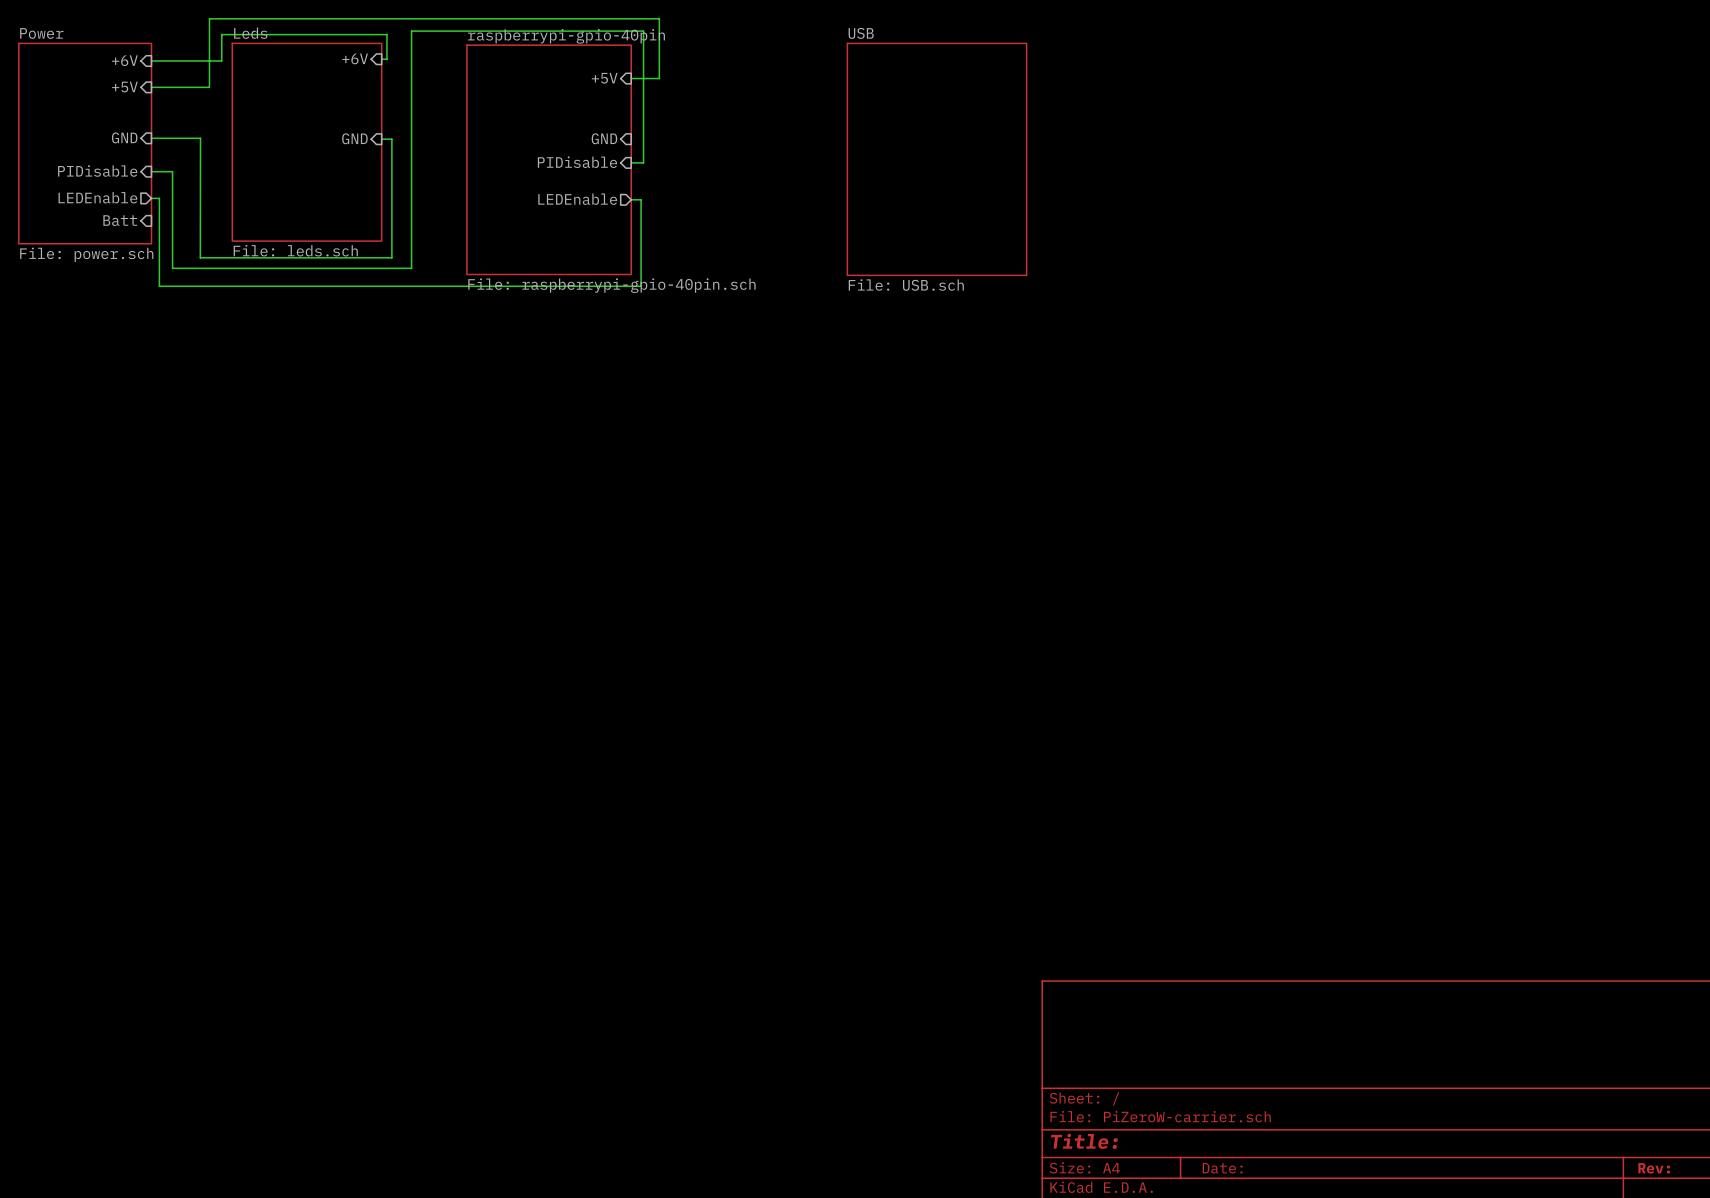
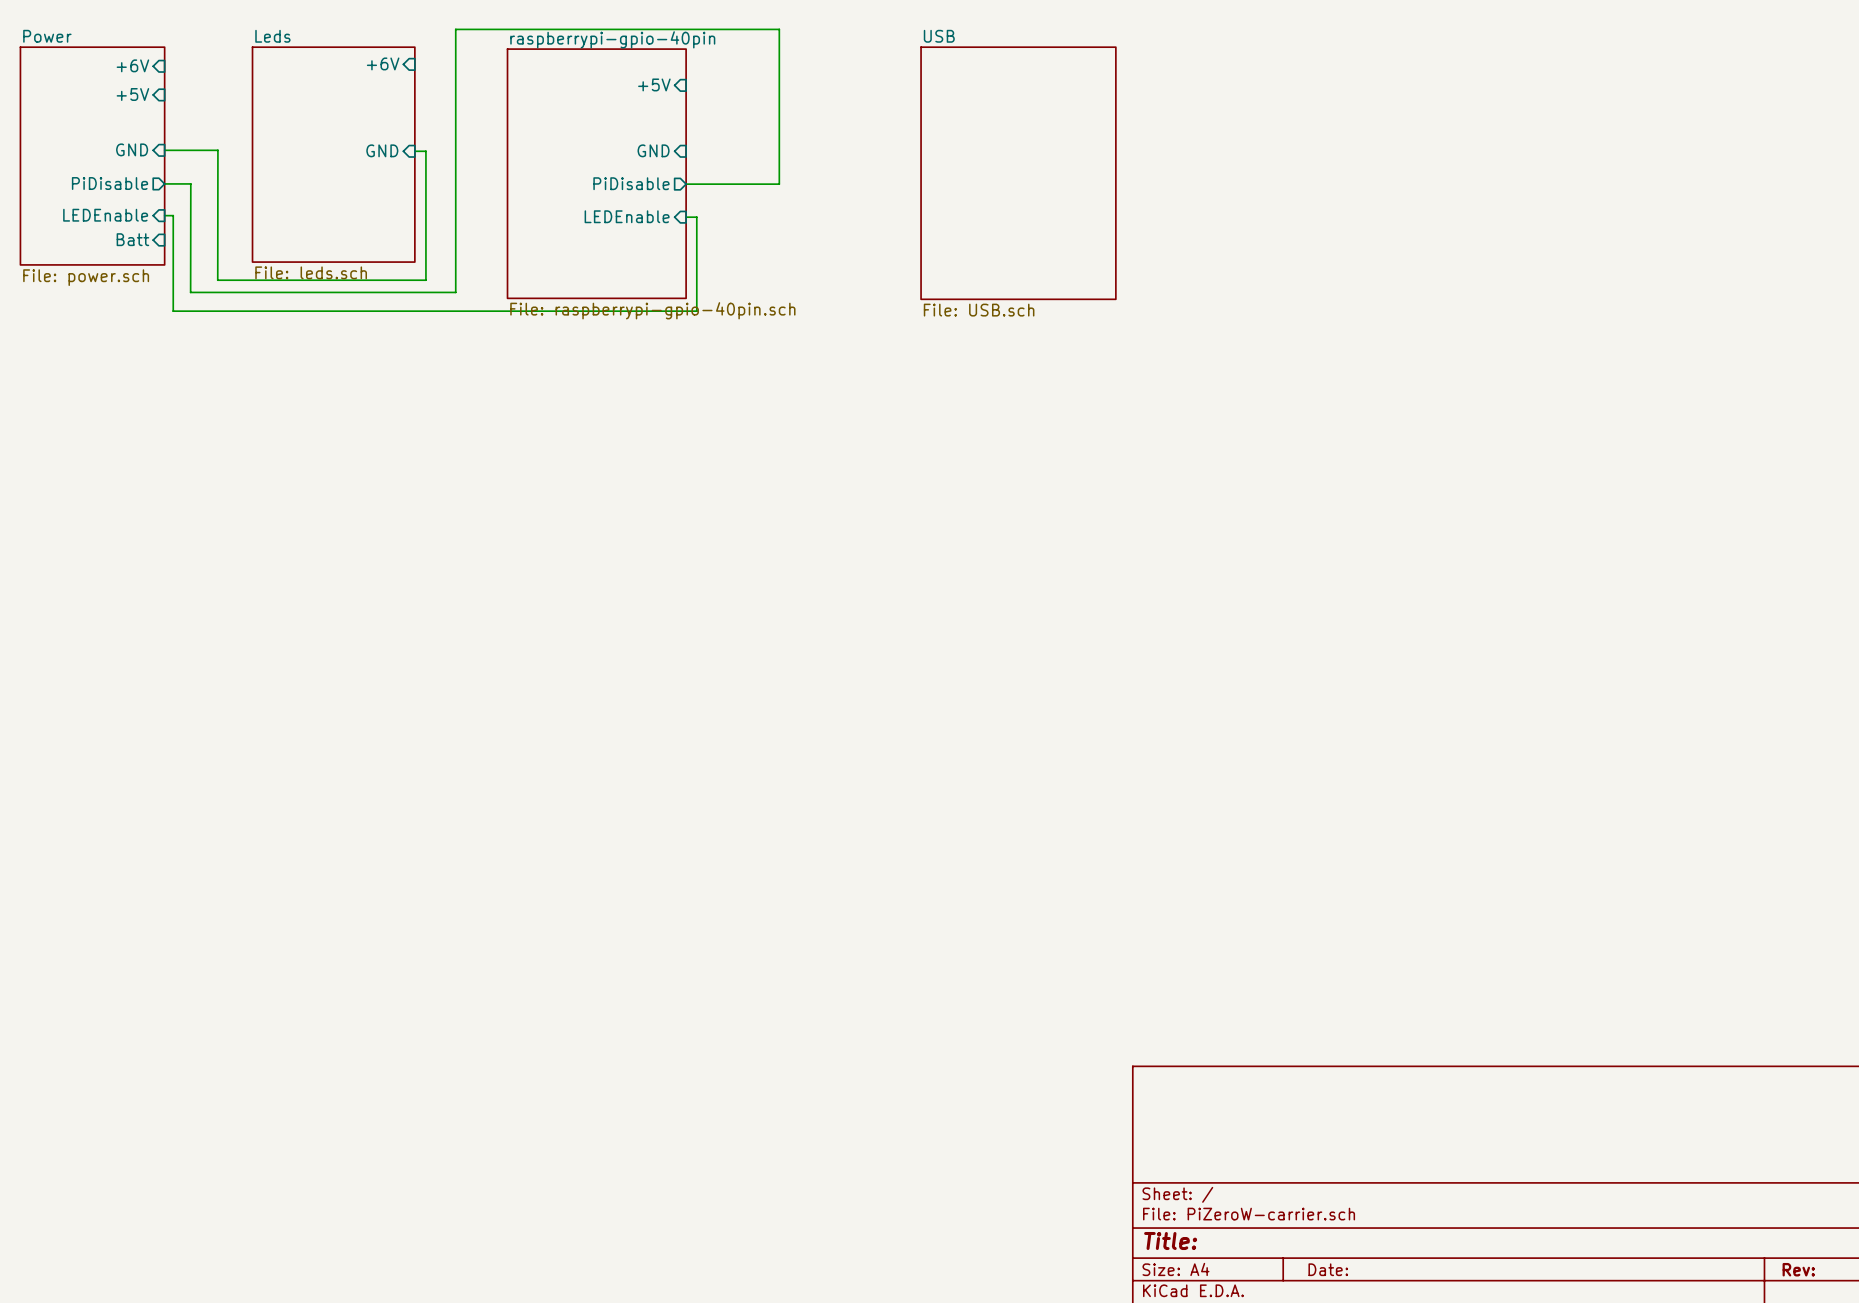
wire: (381, 59) (386, 59) (386, 34) (221, 34) (221, 60) (151, 60) -> none
wire: (631, 78) (659, 78) (659, 18) (209, 18) (209, 87) (151, 87) -> none
sheet pin shape: input (577, 162) -> output (631, 183)
sheet pin: PIDisable (577, 162) -> PiDisable (631, 183)
wire: (631, 162) (643, 162) (643, 31) (411, 31) (411, 268) (172, 268) (172, 171) (151, 171) -> none
wire: none -> (164, 183) (190, 183) (190, 292) (455, 292) (455, 29) (779, 29) (779, 184) (686, 184)
sheet pin shape: input (97, 171) -> output (110, 183)
sheet pin: PIDisable (97, 171) -> PiDisable (110, 183)
sheet pin shape: output (97, 197) -> input (105, 215)
sheet pin shape: output (577, 199) -> input (627, 216)

